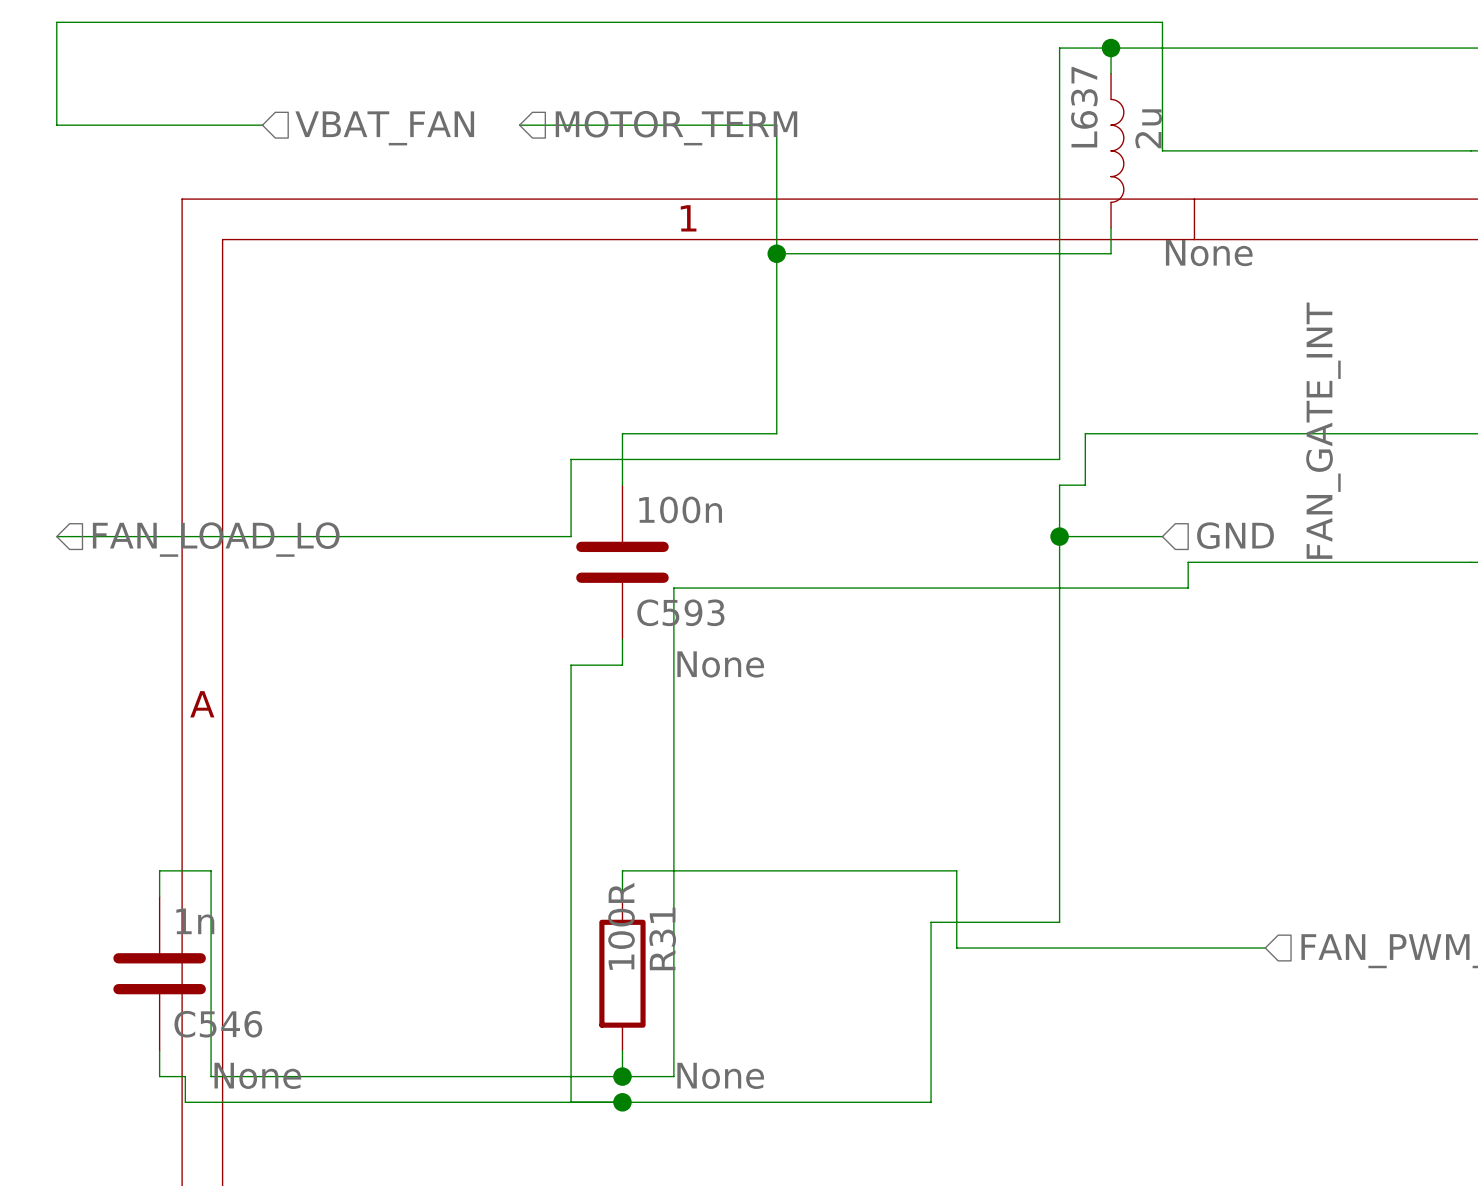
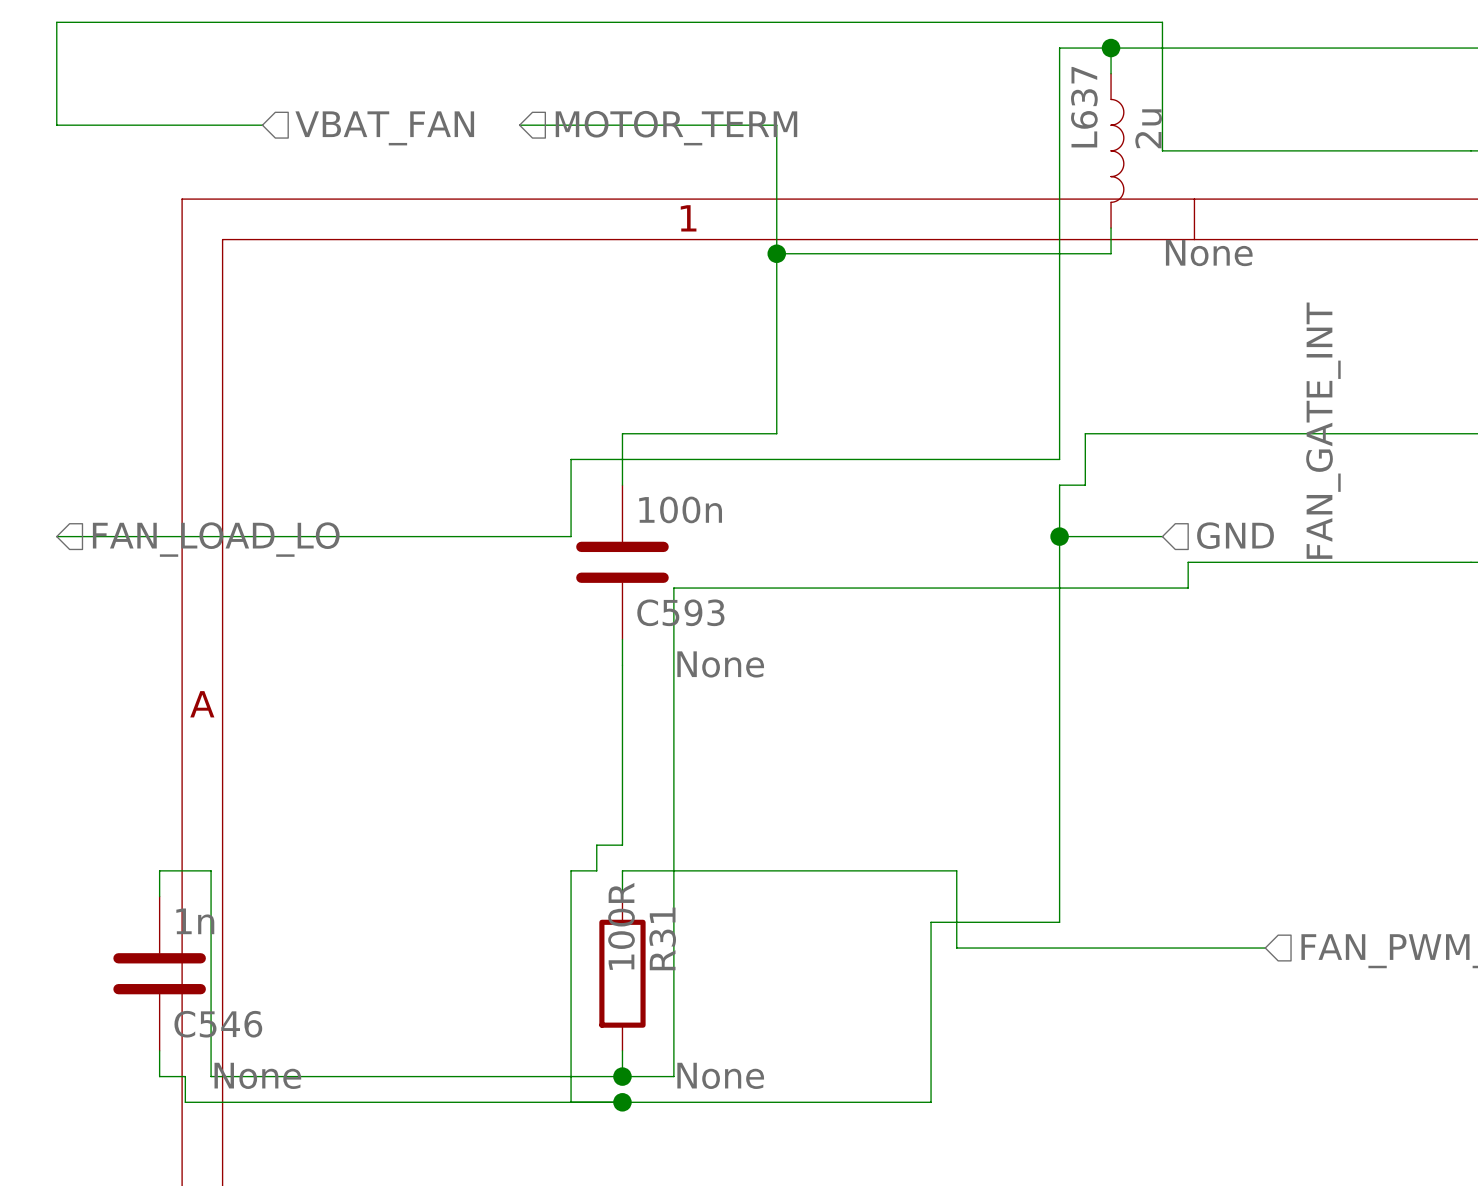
wire: (622, 665) (571, 665) (571, 870) -> (622, 665) (622, 845) (596, 845) (596, 870) (571, 870)

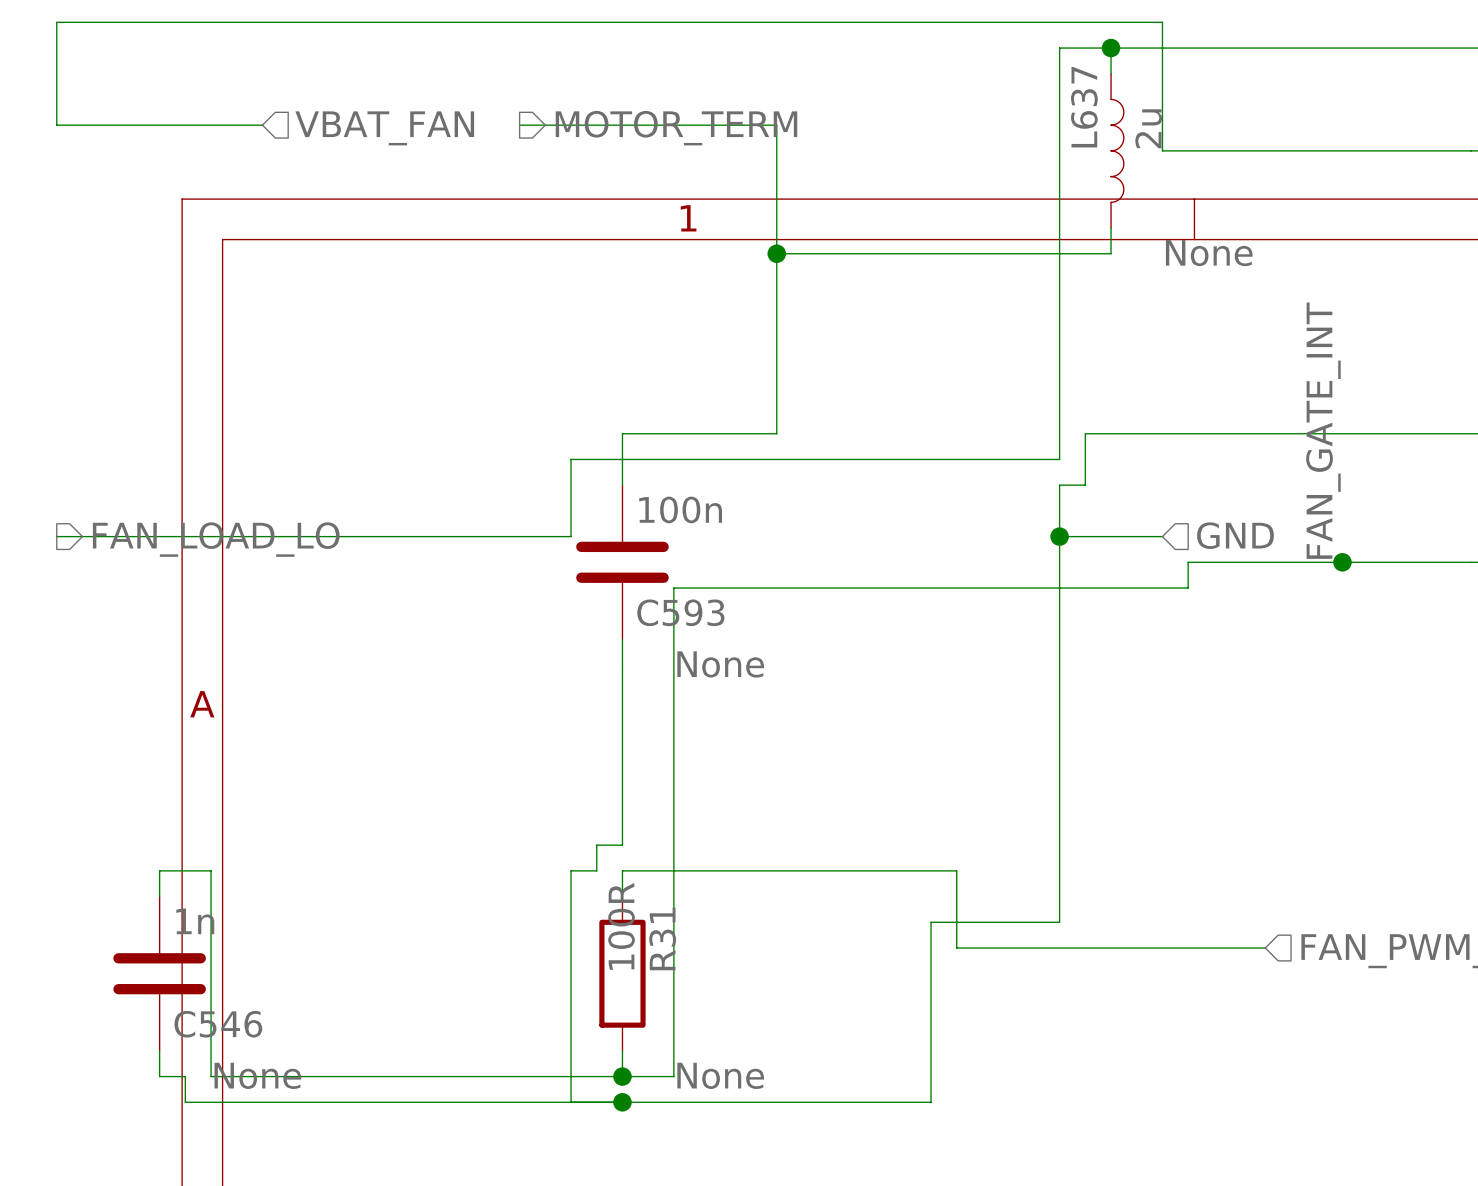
hierarchical label shape: input (676, 128) -> output (676, 128)
hierarchical label shape: input (216, 539) -> output (216, 539)
junction: none -> (1342, 562)

